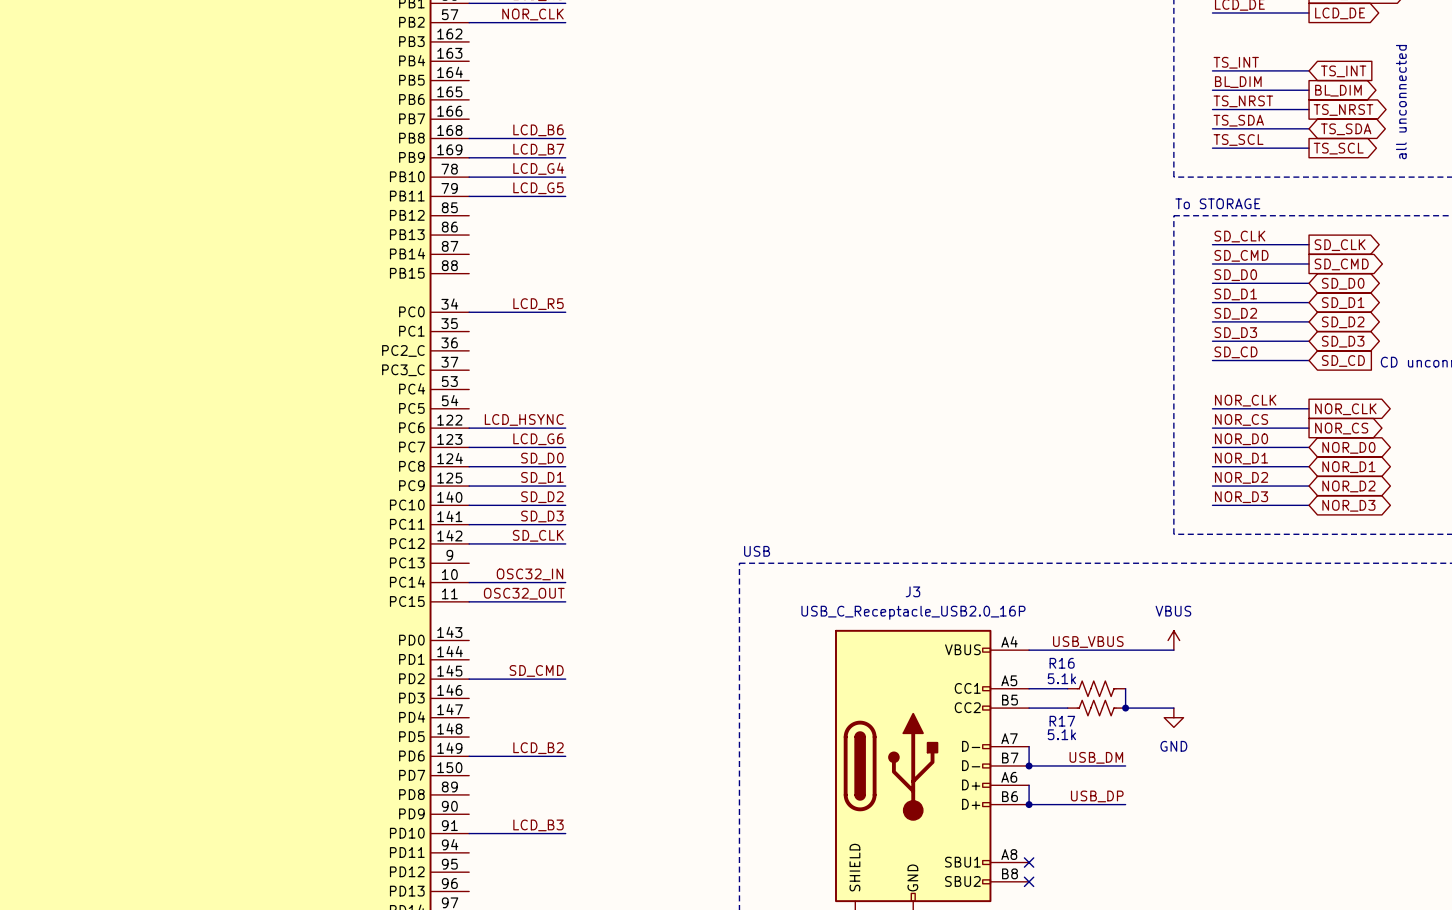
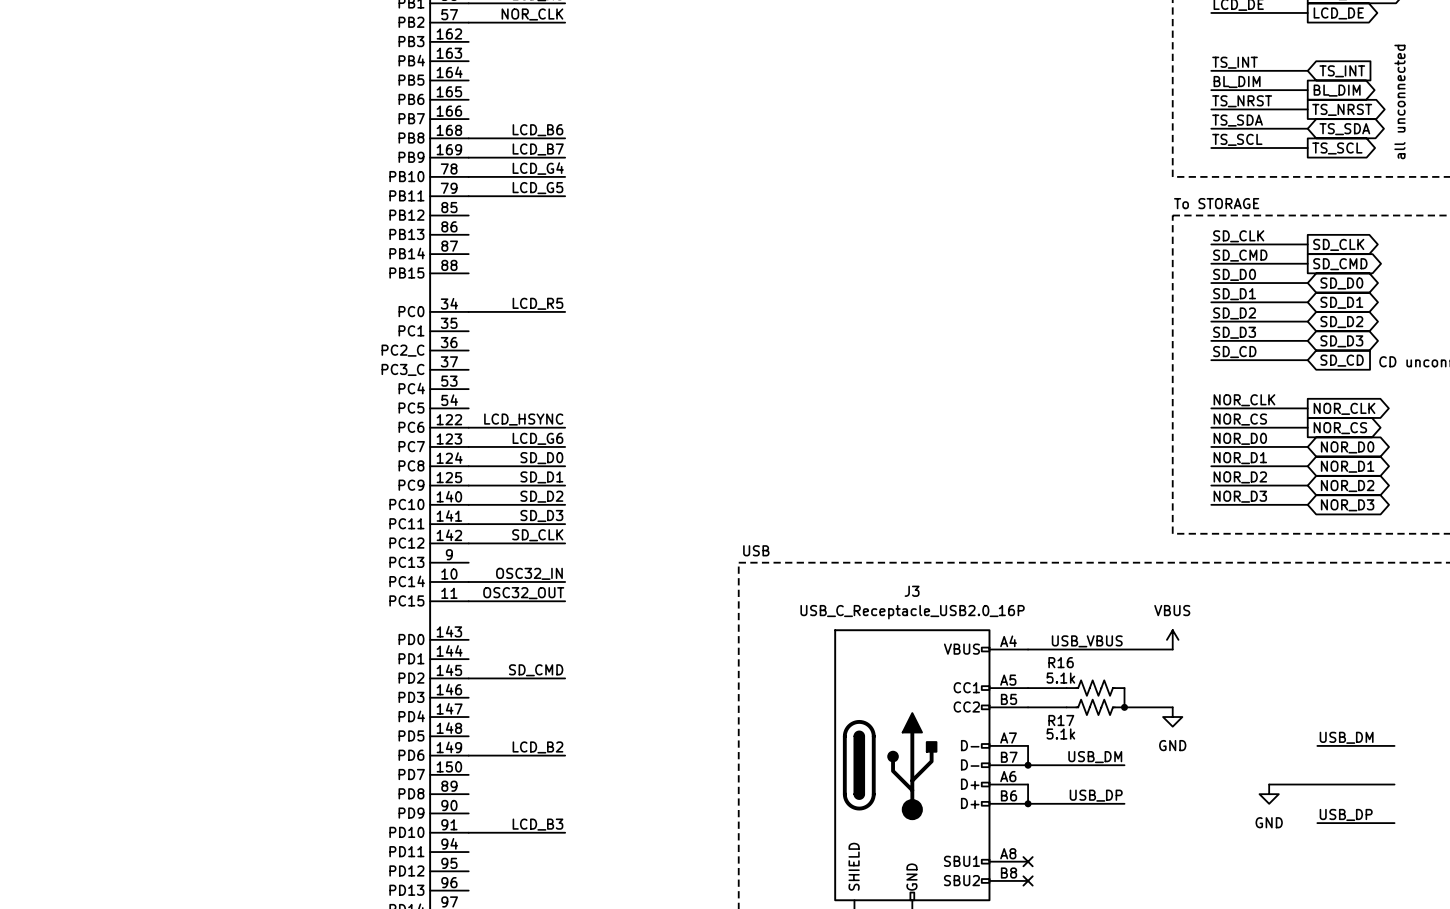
label: none -> USB_DM (1346, 737)
wire: none -> (1317, 745) (1394, 745)
wire: none -> (1269, 784) (1394, 784)
power symbol: none -> GND (1269, 794)
label: none -> USB_DP (1346, 814)
wire: none -> (1317, 823) (1394, 823)

